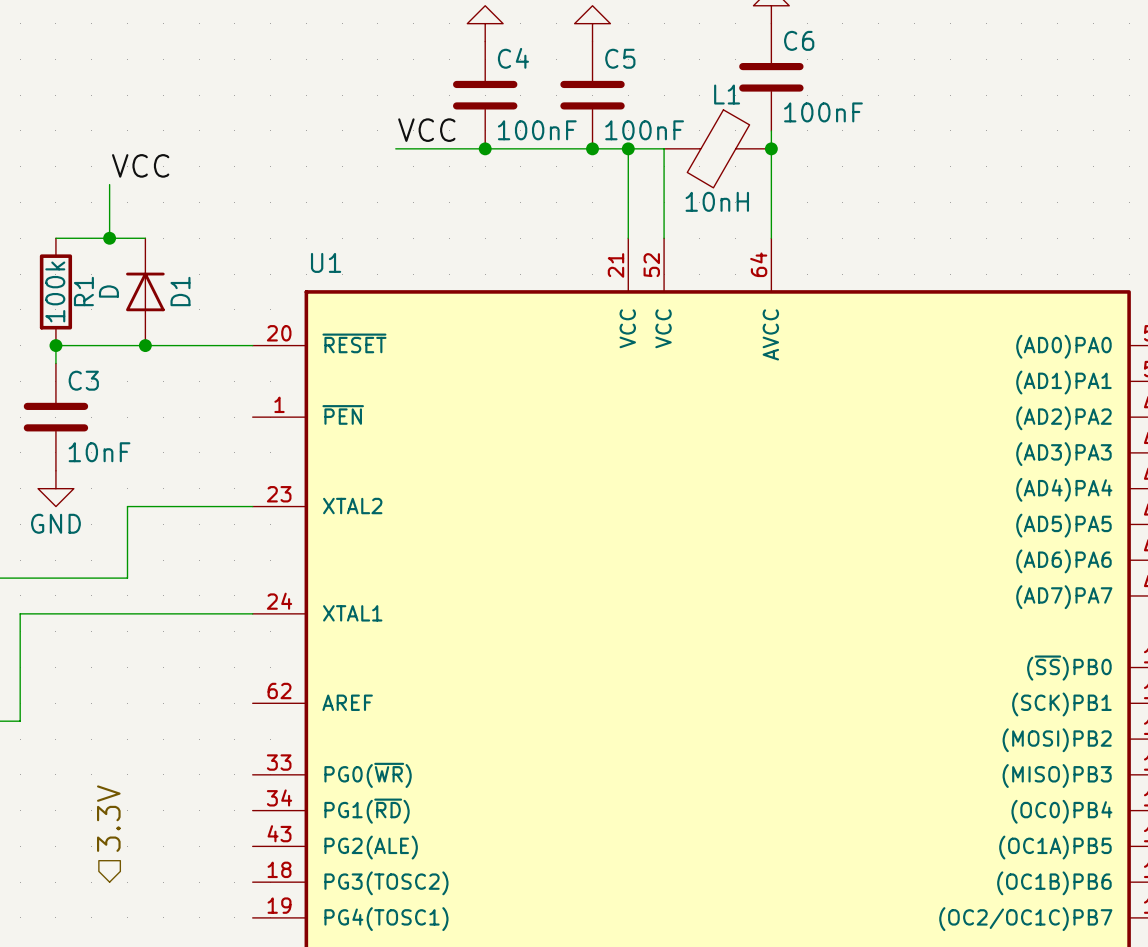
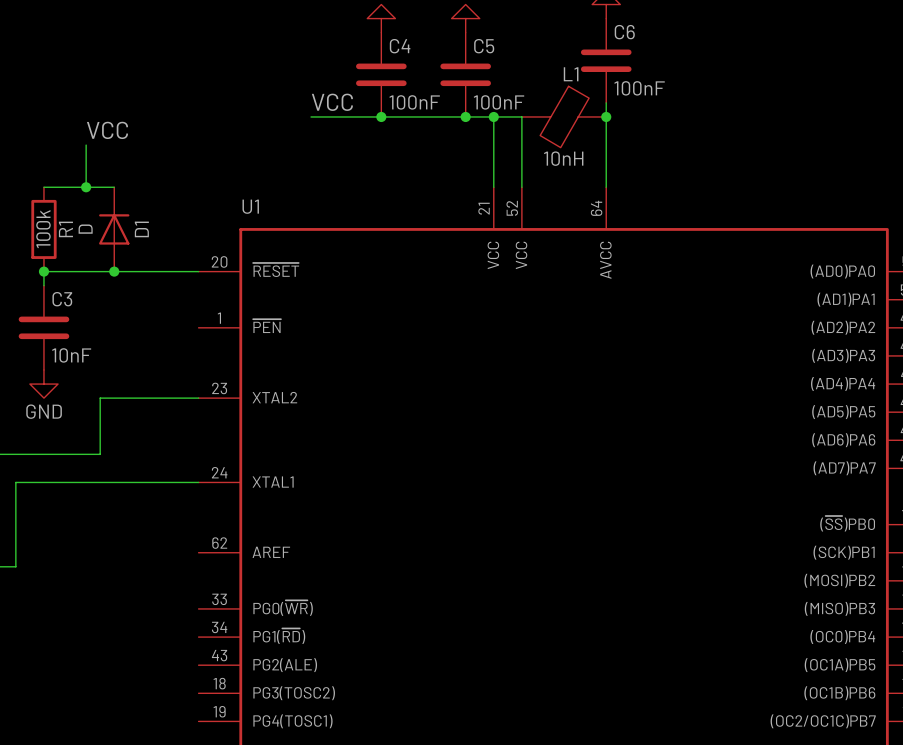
hierarchical label: 3.3V (108, 818) -> none

